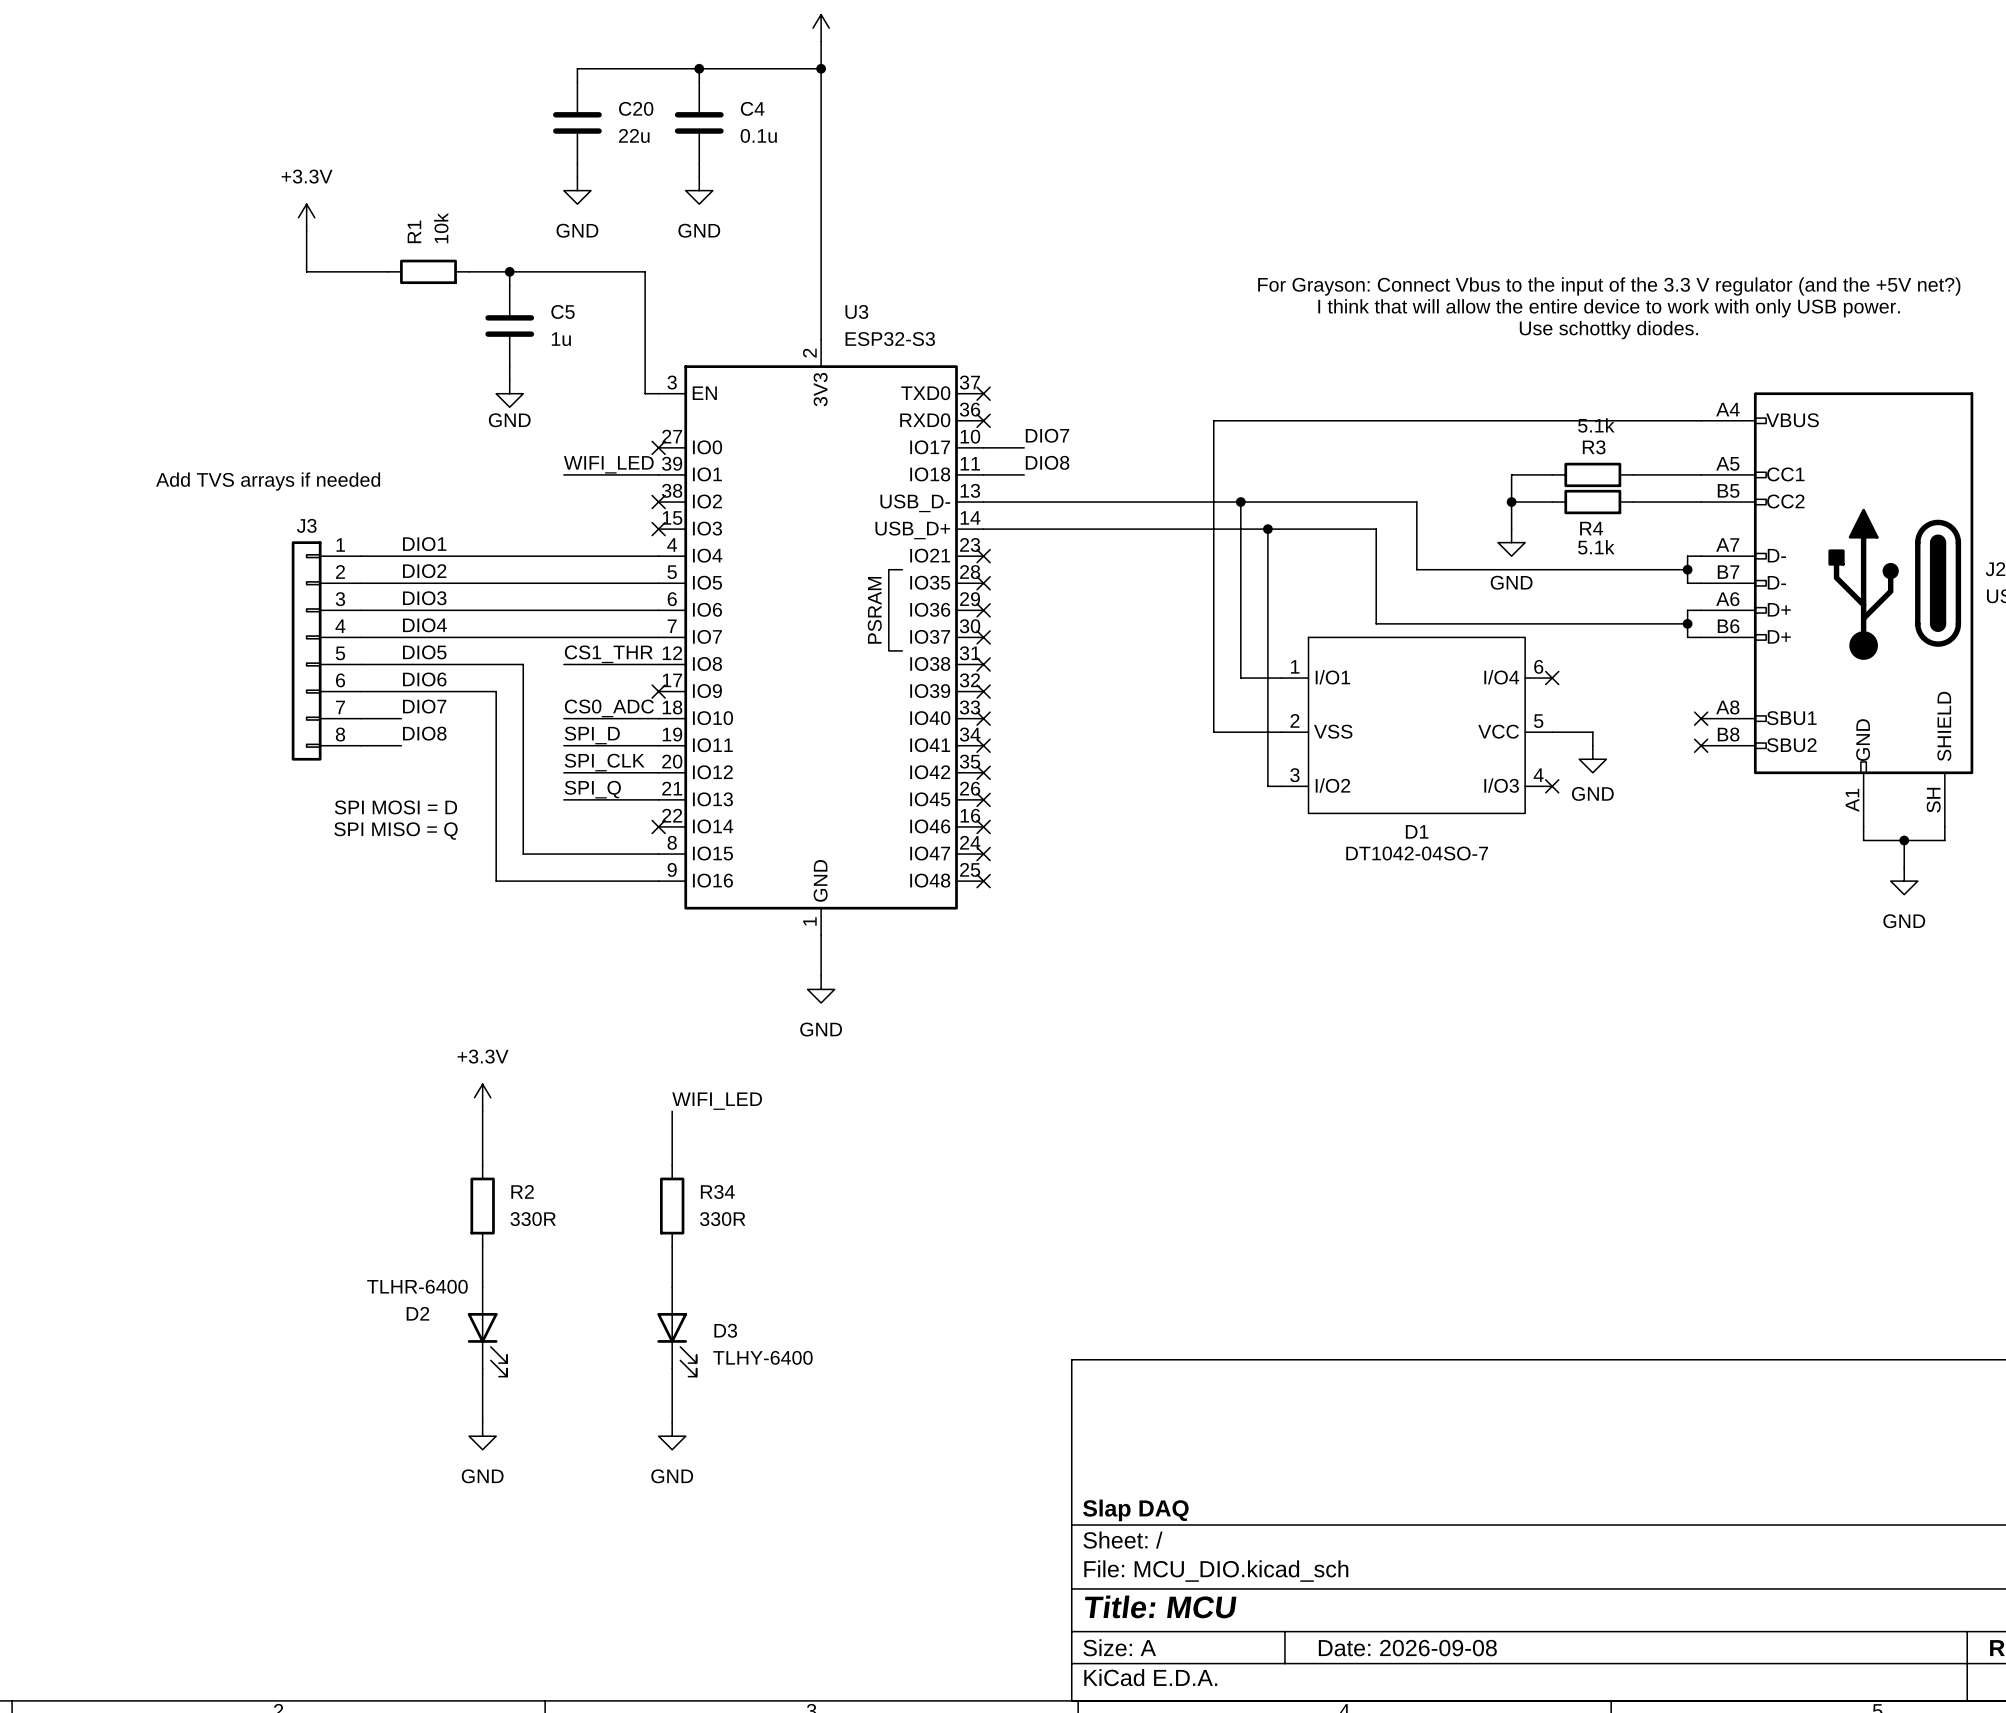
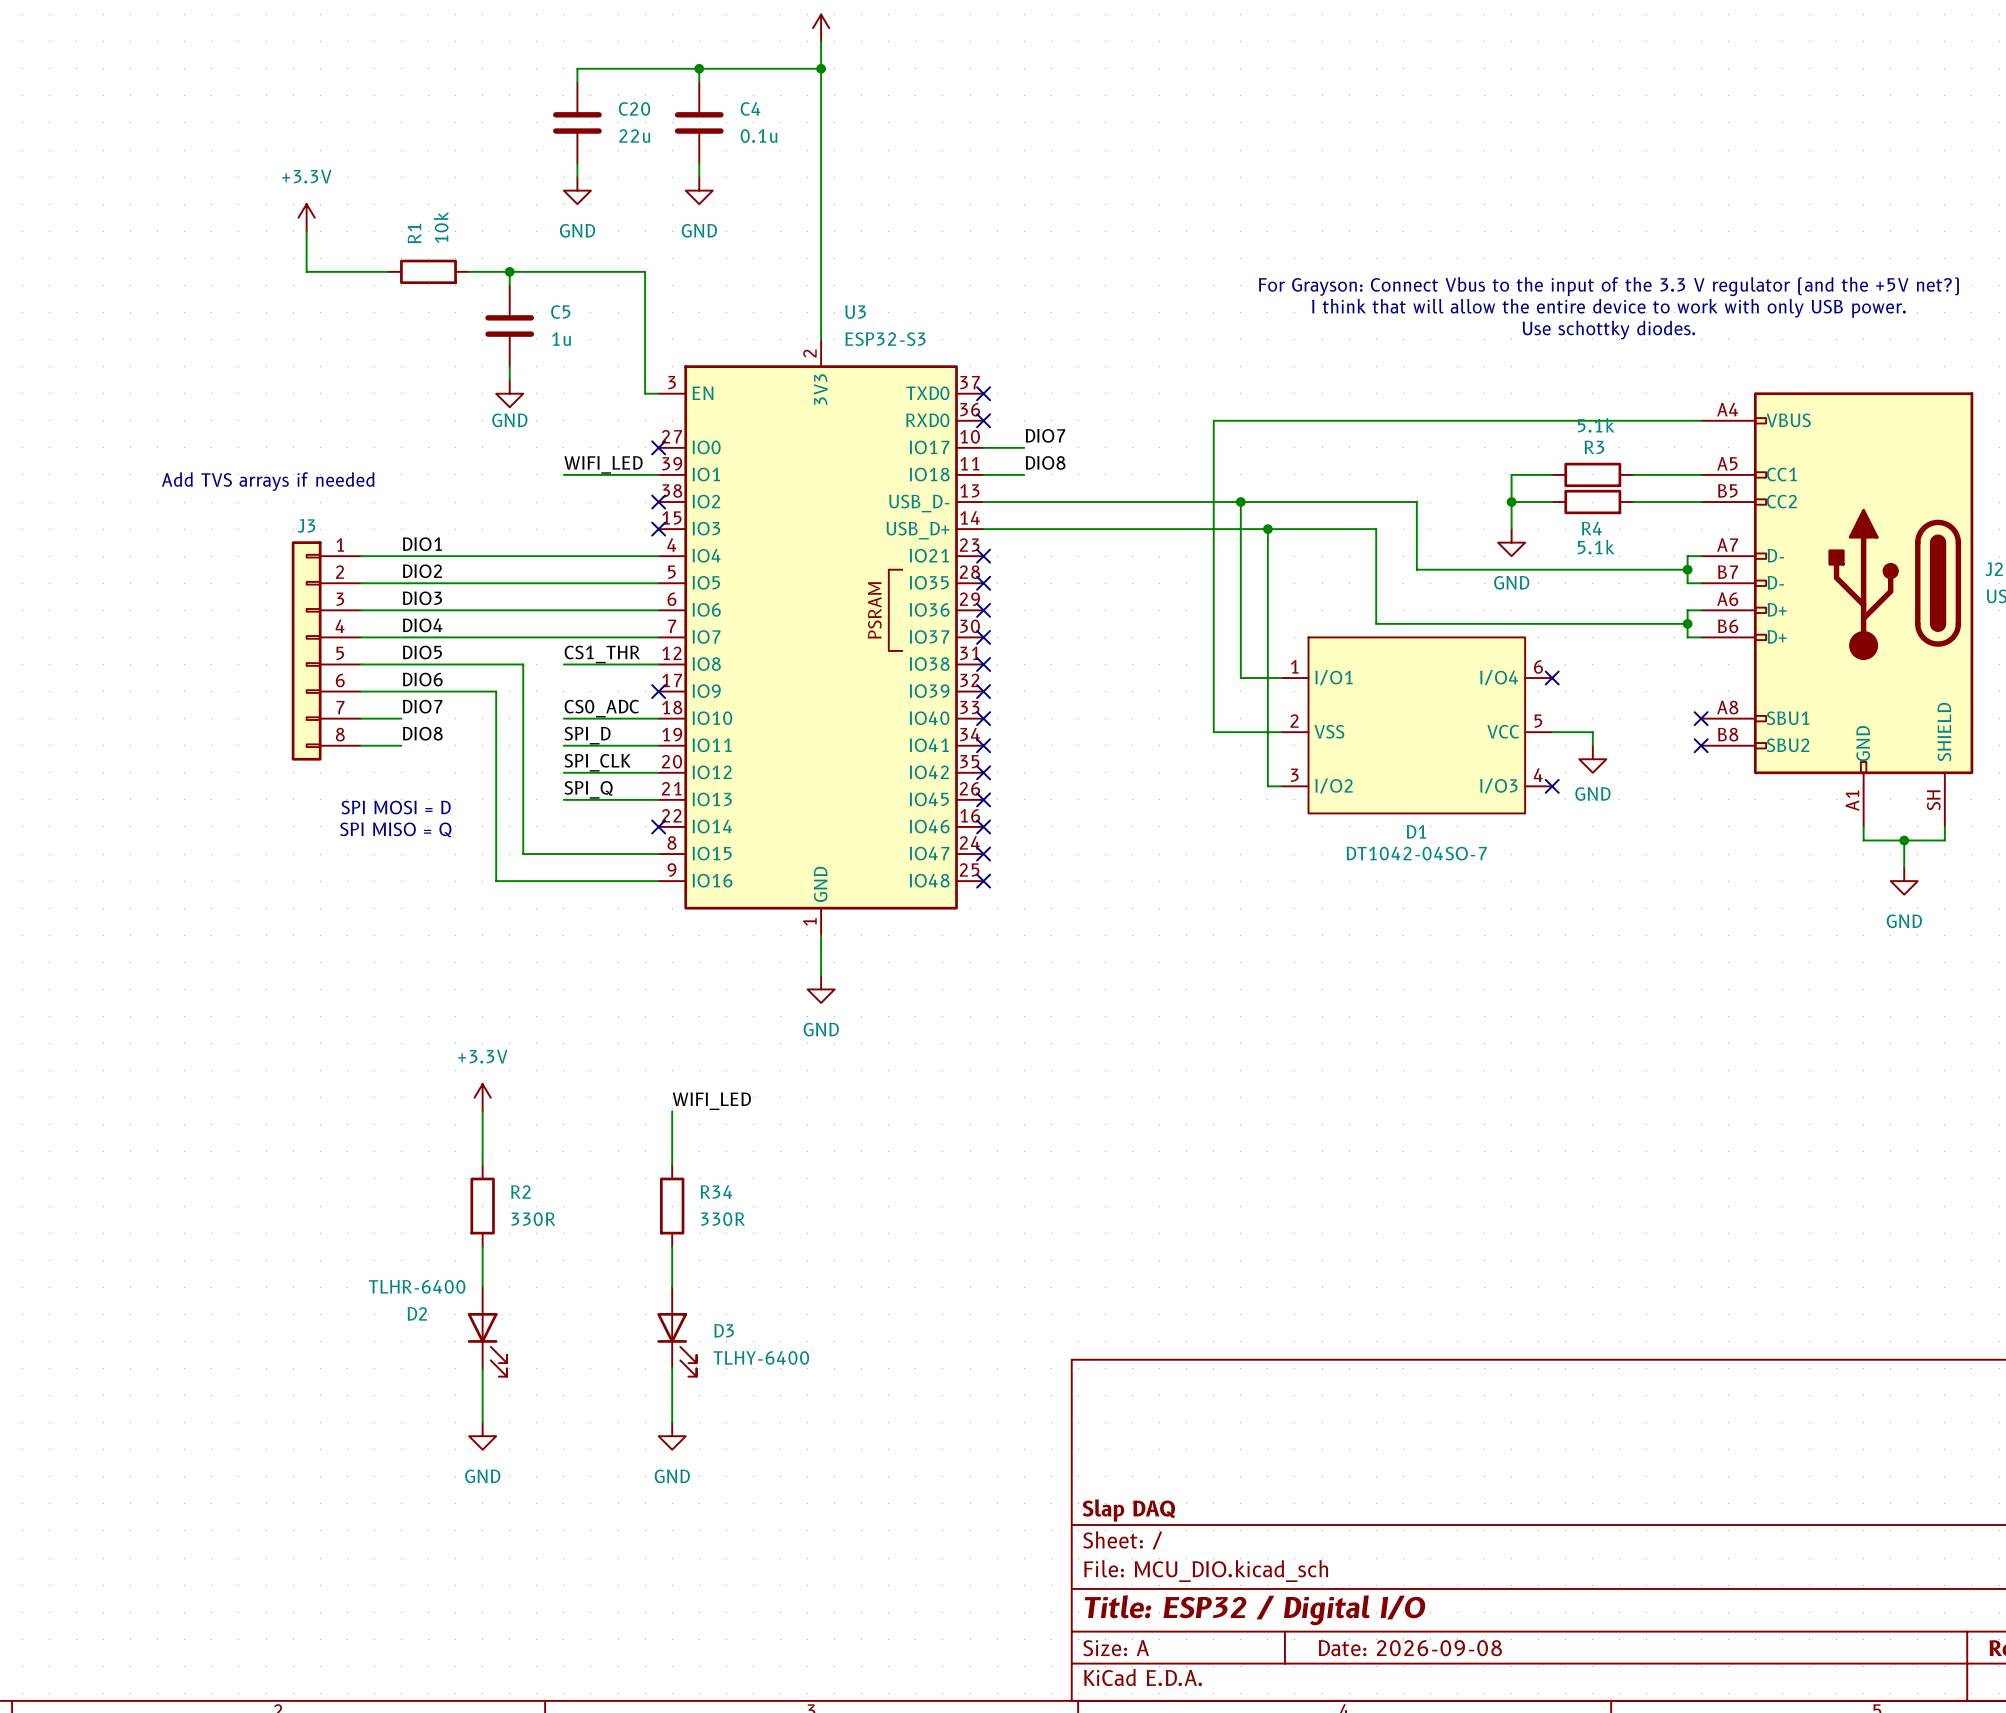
title block: Title: MCU (1160, 1606) -> Title: ESP32 / Digital I/O (1255, 1610)

